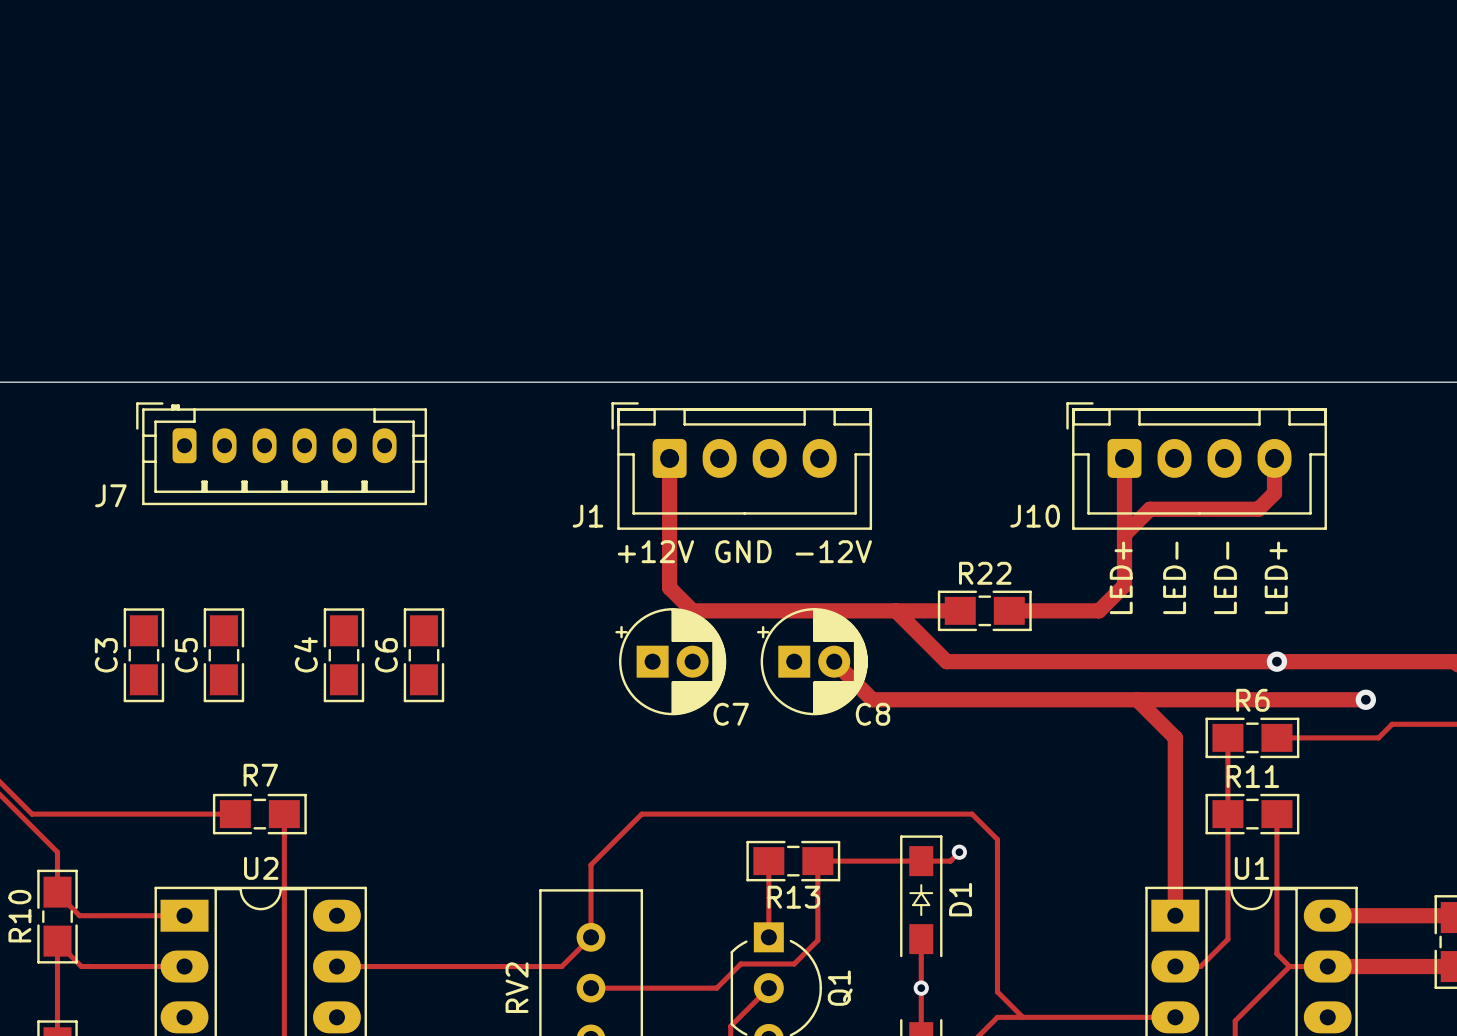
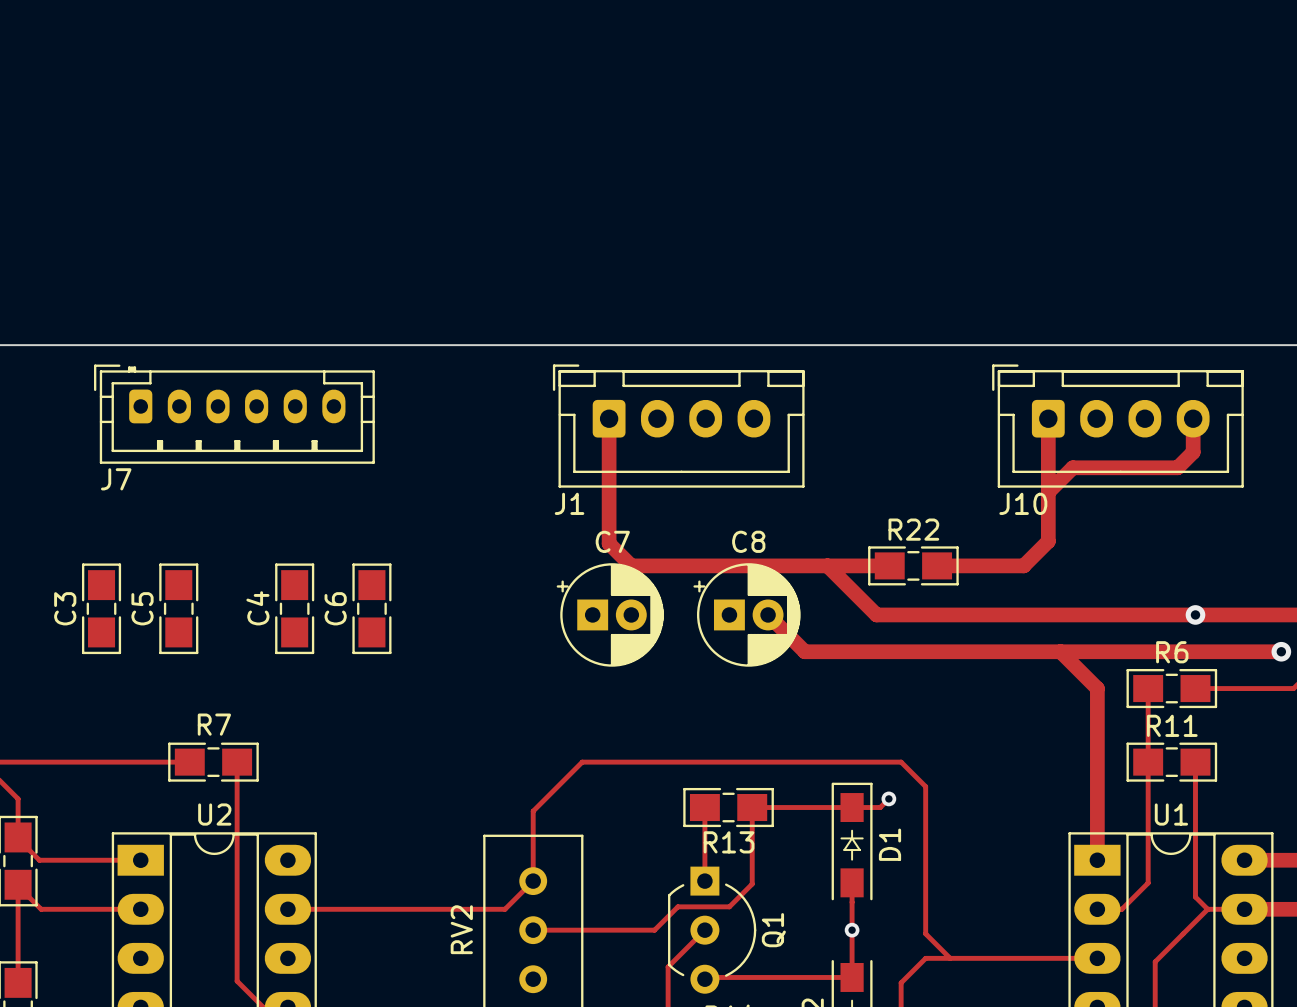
J7 name position: J7 (110, 495) -> J7 (116, 479)
J1 name position: J1 (587, 516) -> J1 (569, 503)
J10 name position: J10 (1035, 516) -> J10 (1023, 503)
text: +12V (655, 551) -> none
text: GND (743, 551) -> none
text: -12V (833, 551) -> none
text: LED+ (1121, 577) -> none
text: LED- (1174, 577) -> none
text: LED- (1225, 577) -> none
text: LED+ (1276, 577) -> none
C7 name position: C7 (731, 714) -> C7 (612, 541)
C8 name position: C8 (873, 714) -> C8 (748, 541)

